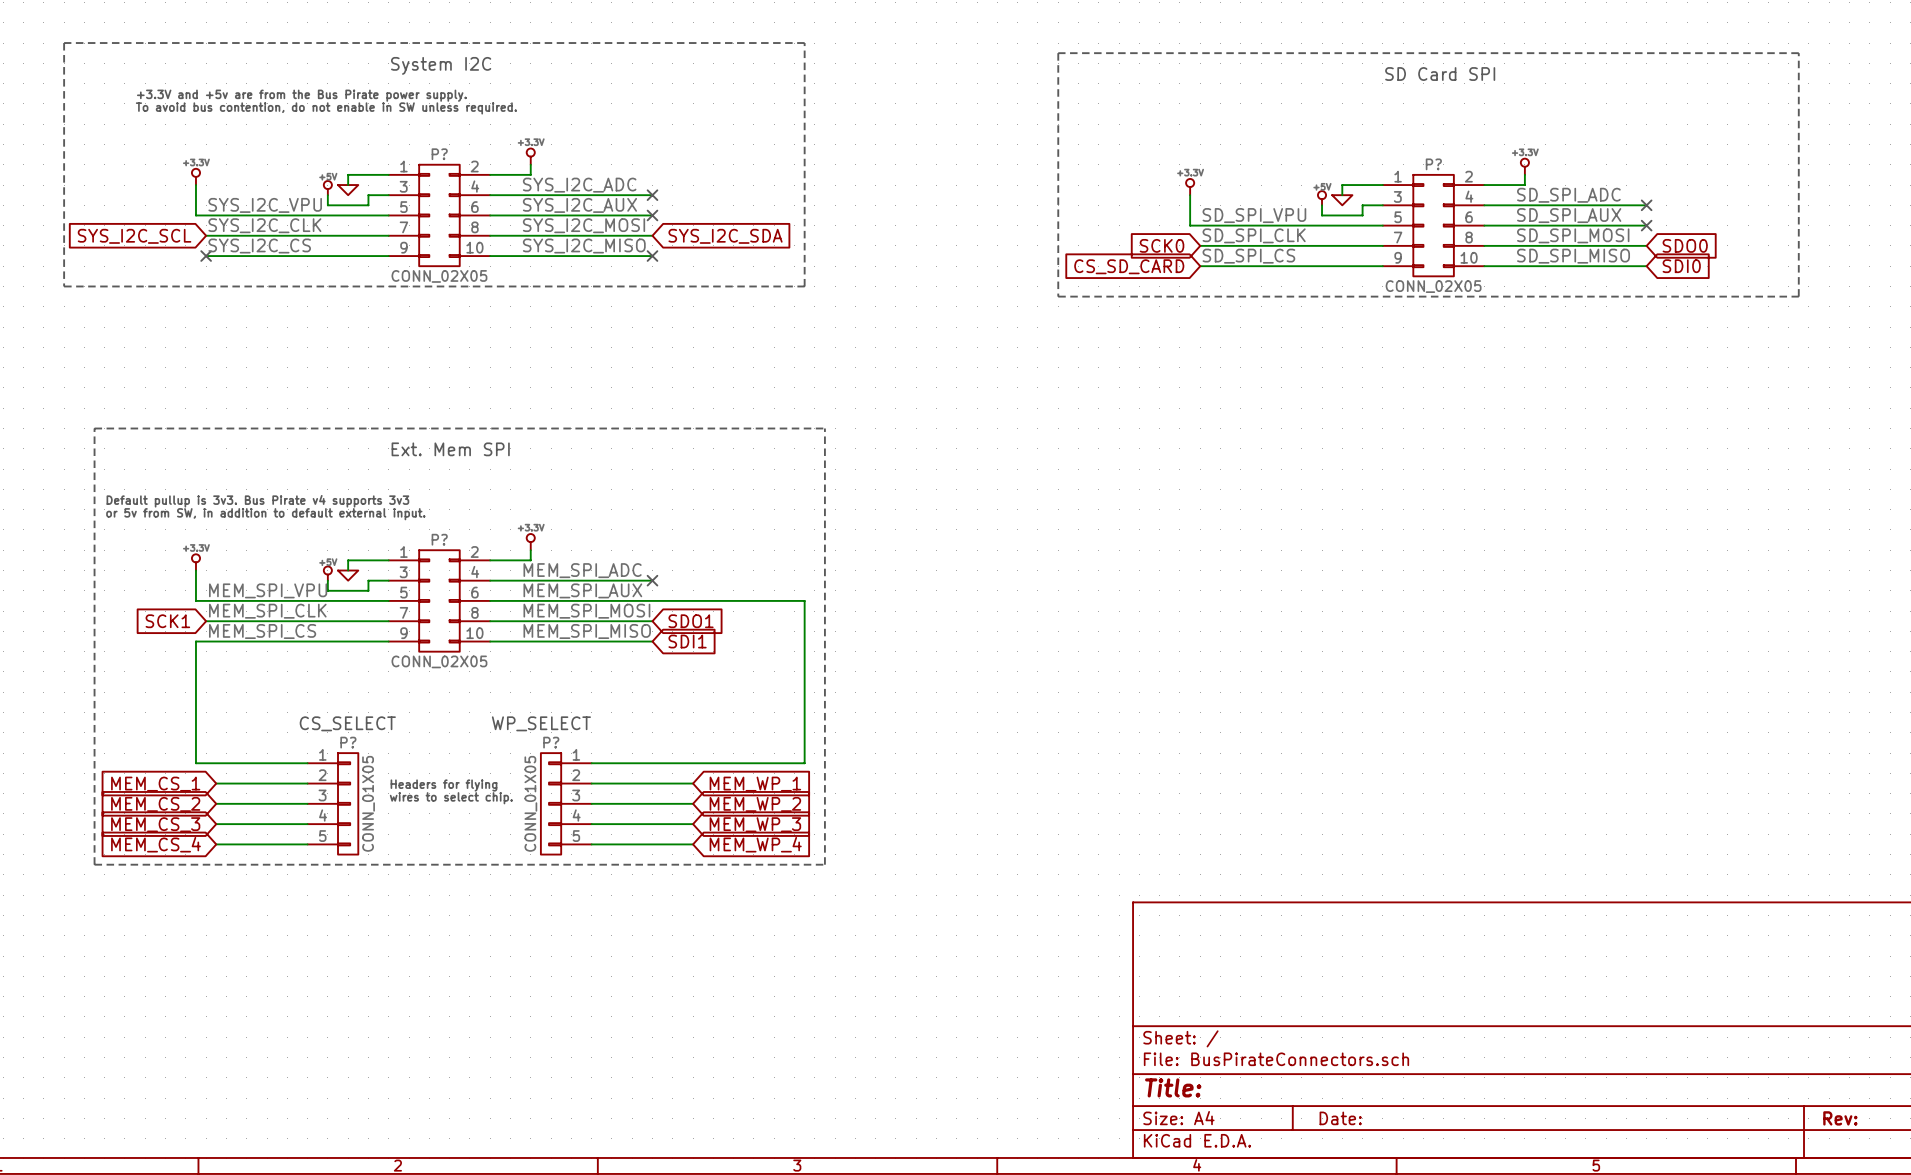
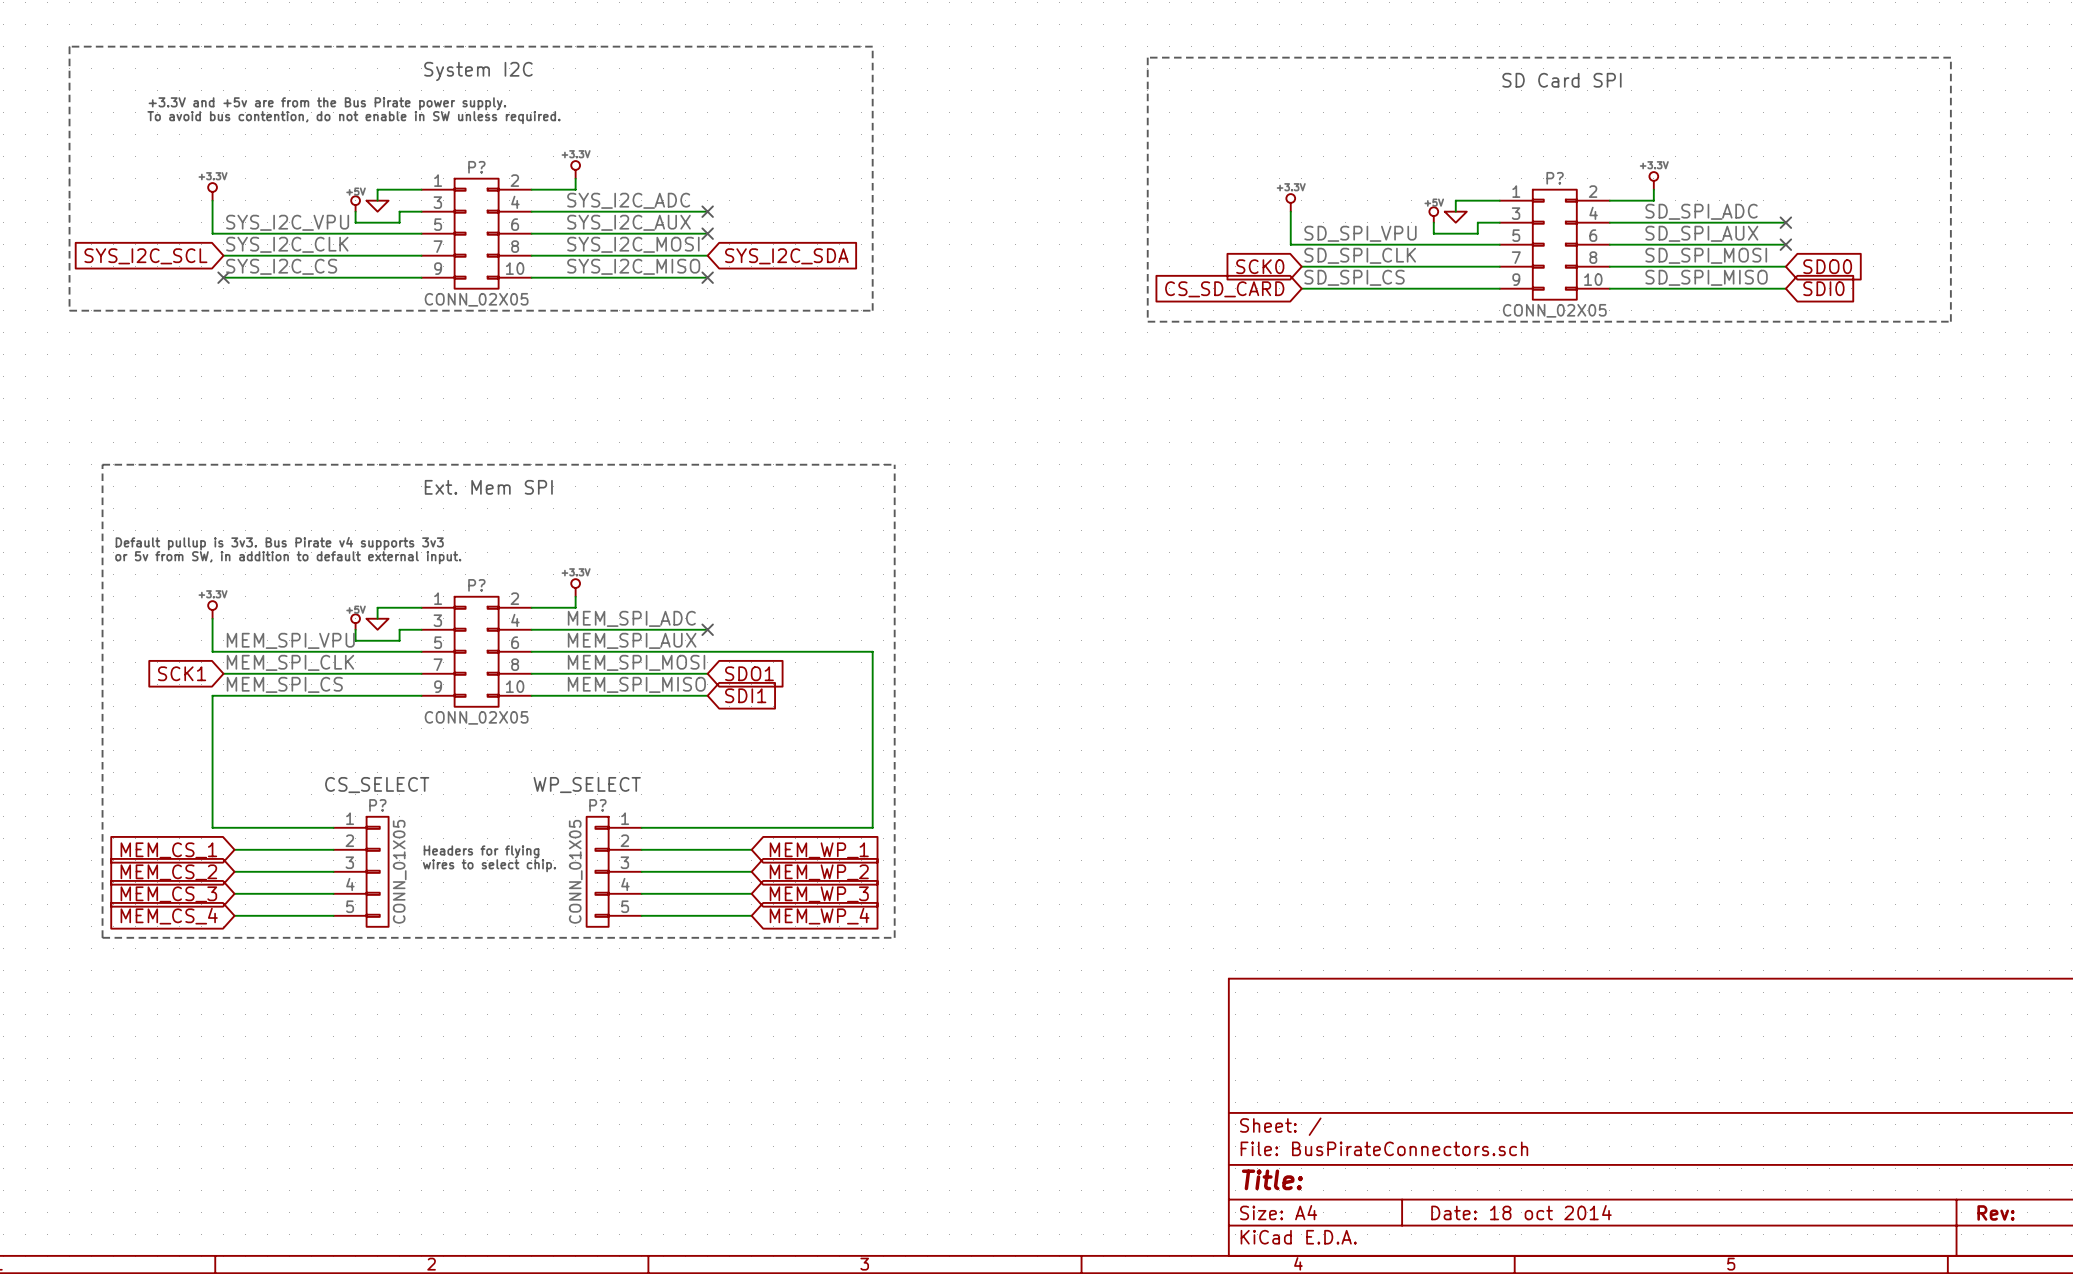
title block: Date: (1340, 1118) -> Date: 18 oct 2014 (1521, 1212)

